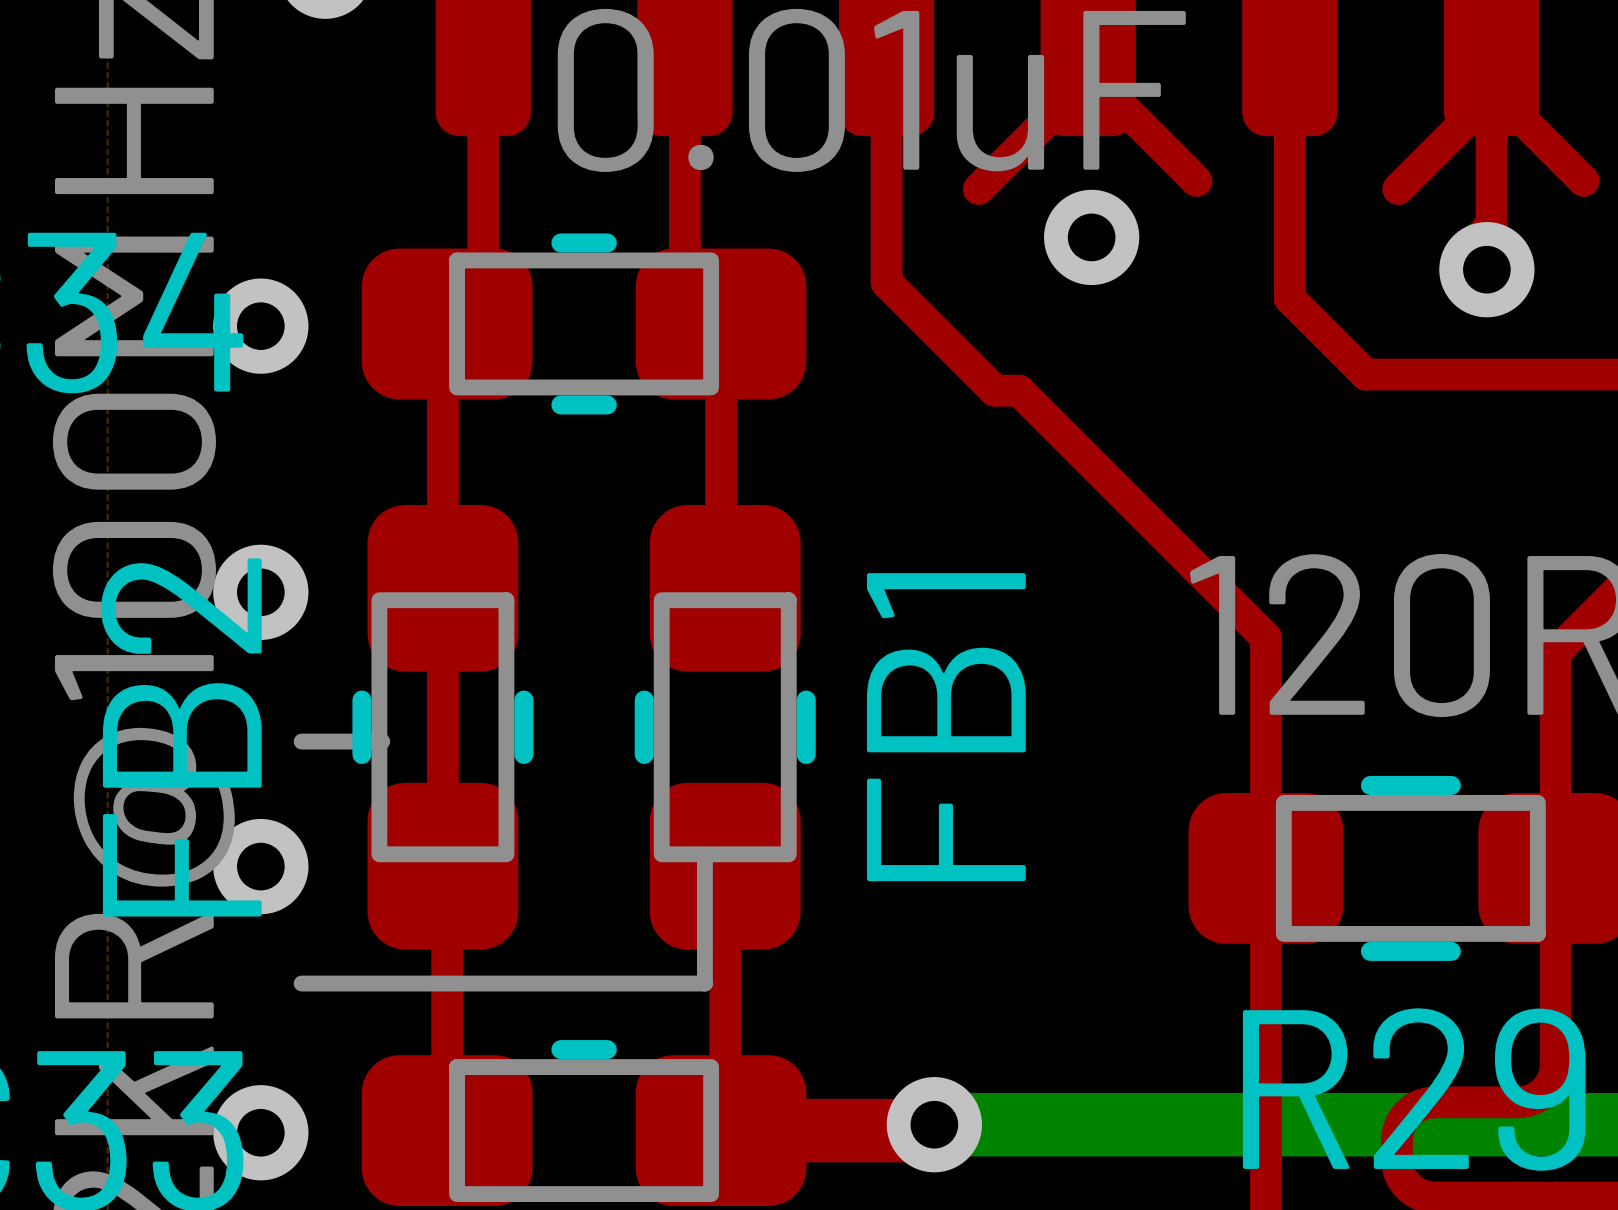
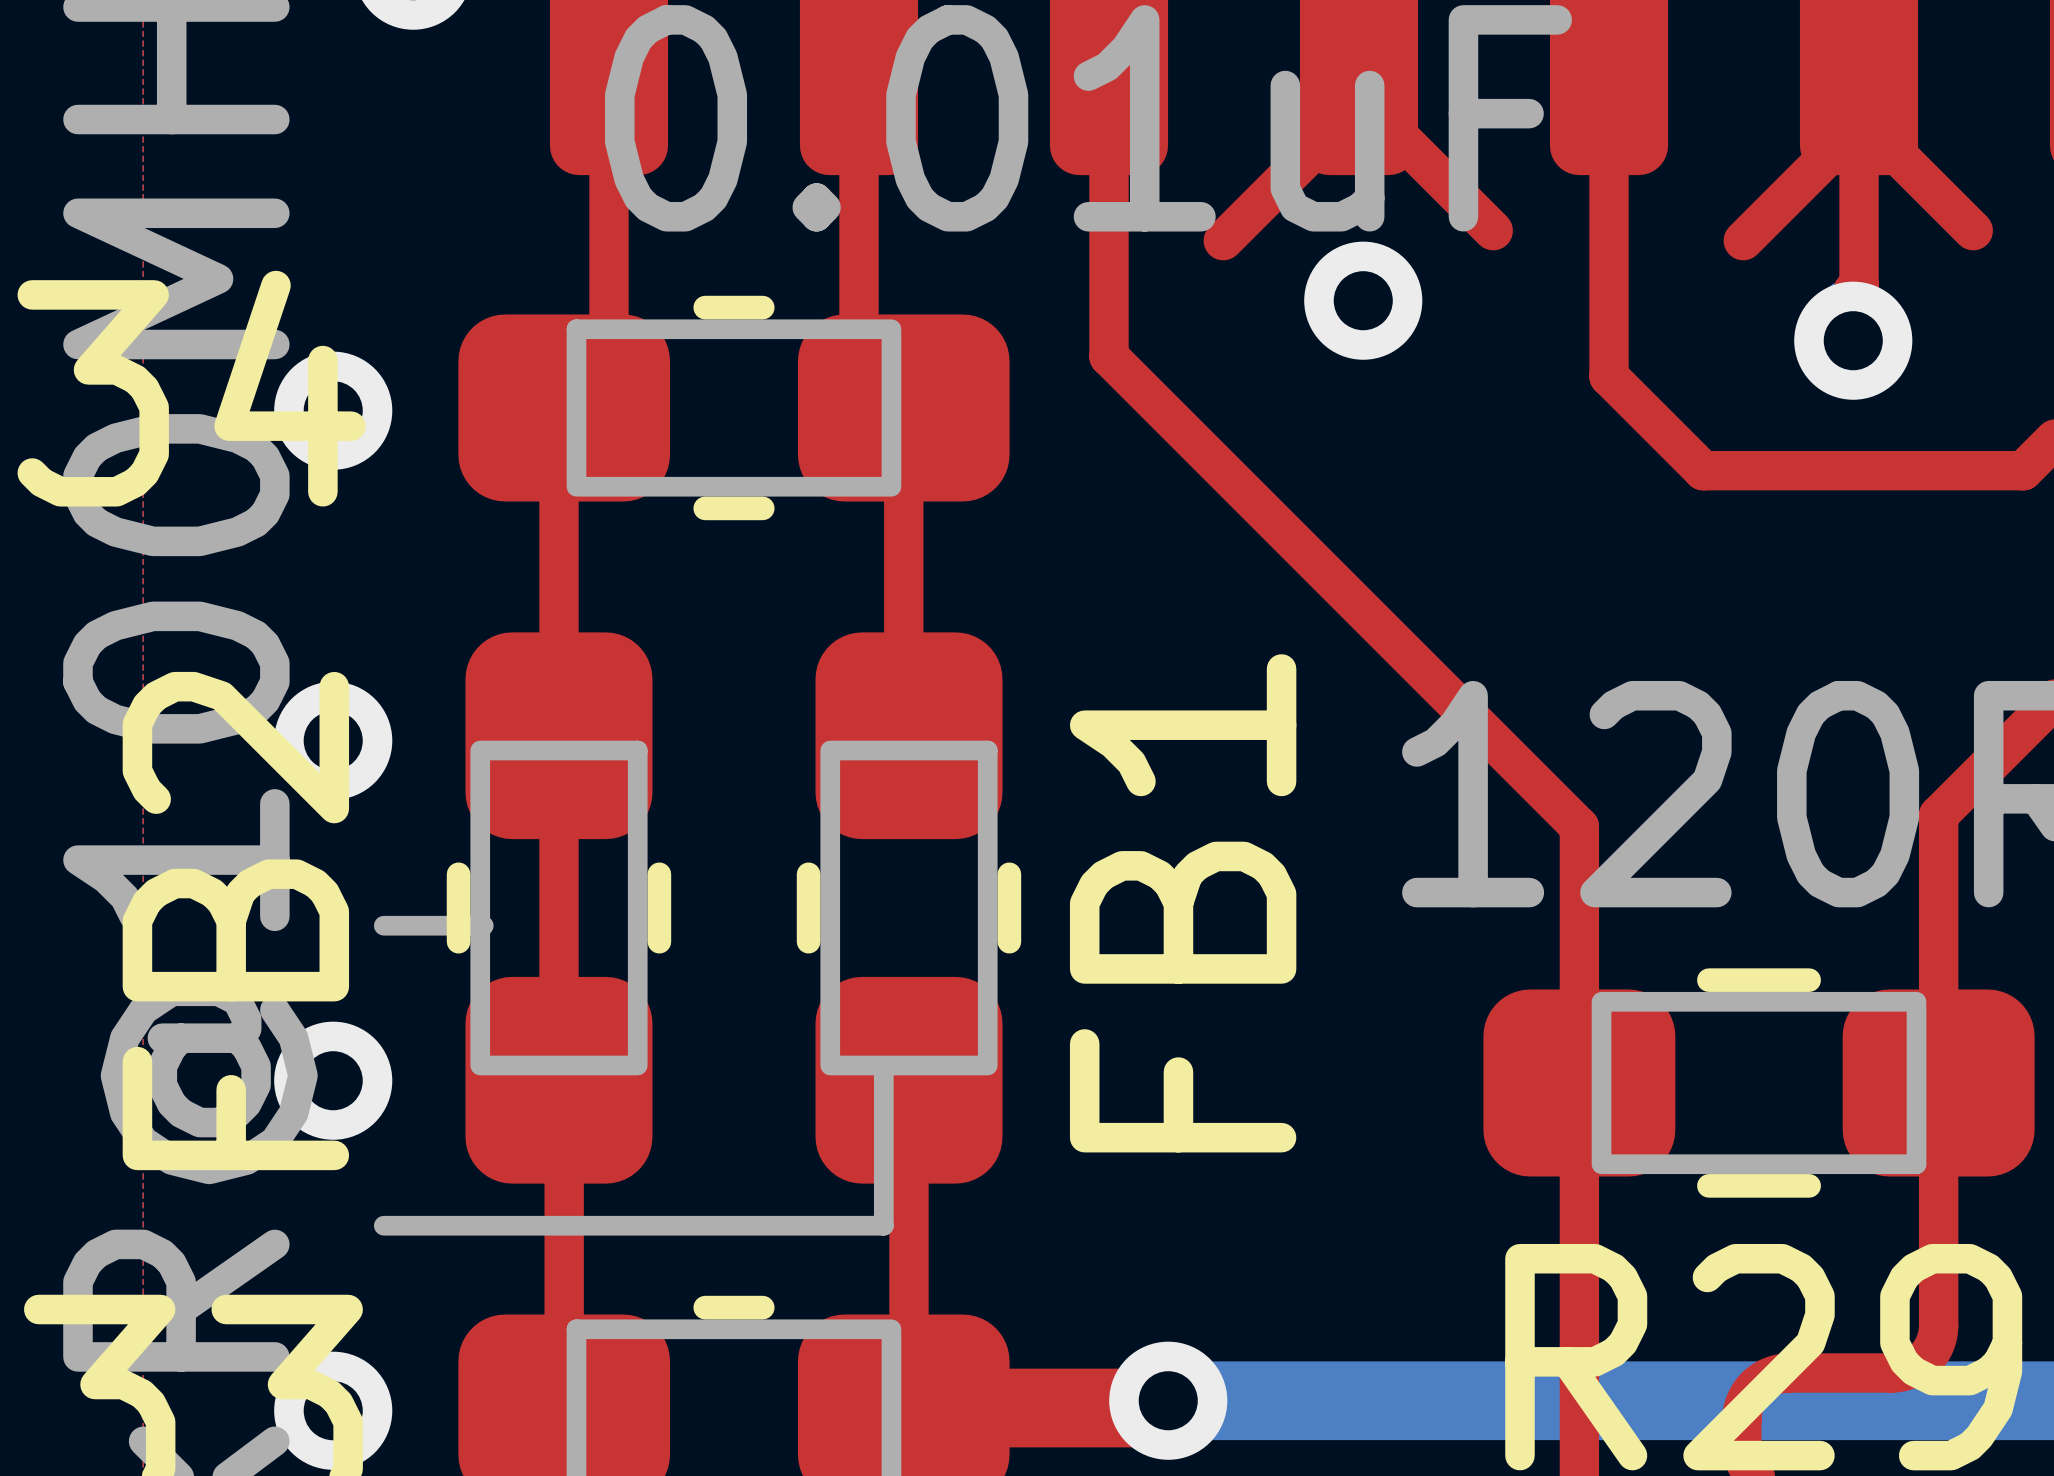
top track: (994, 390) (1019, 390) (1265, 637) (1265, 661) -> (1243, 490) (1579, 826)

